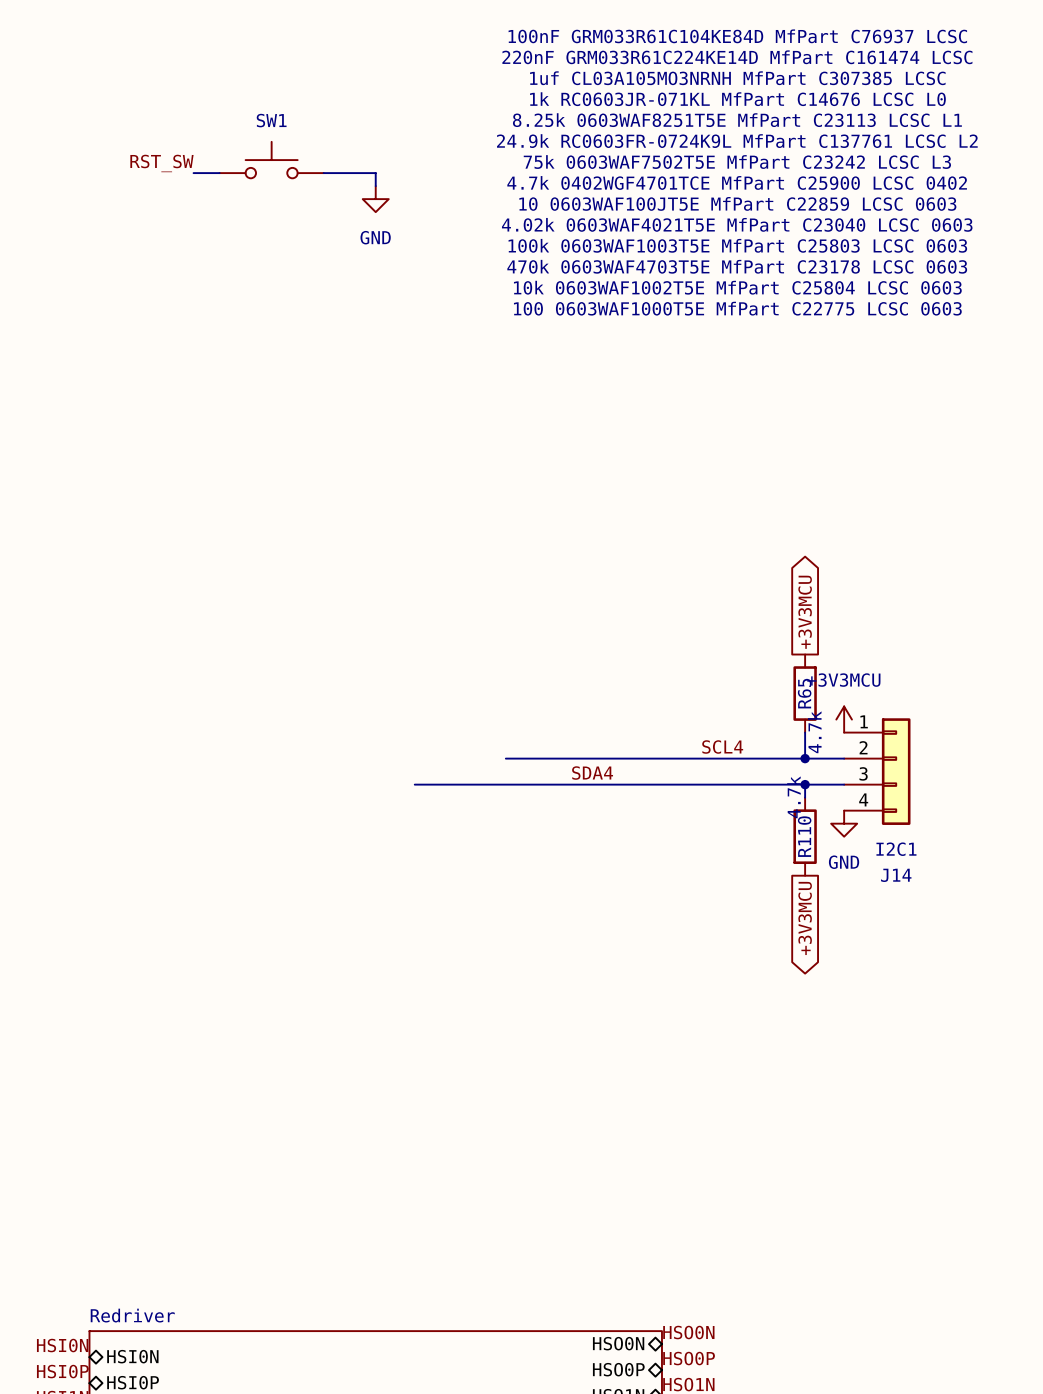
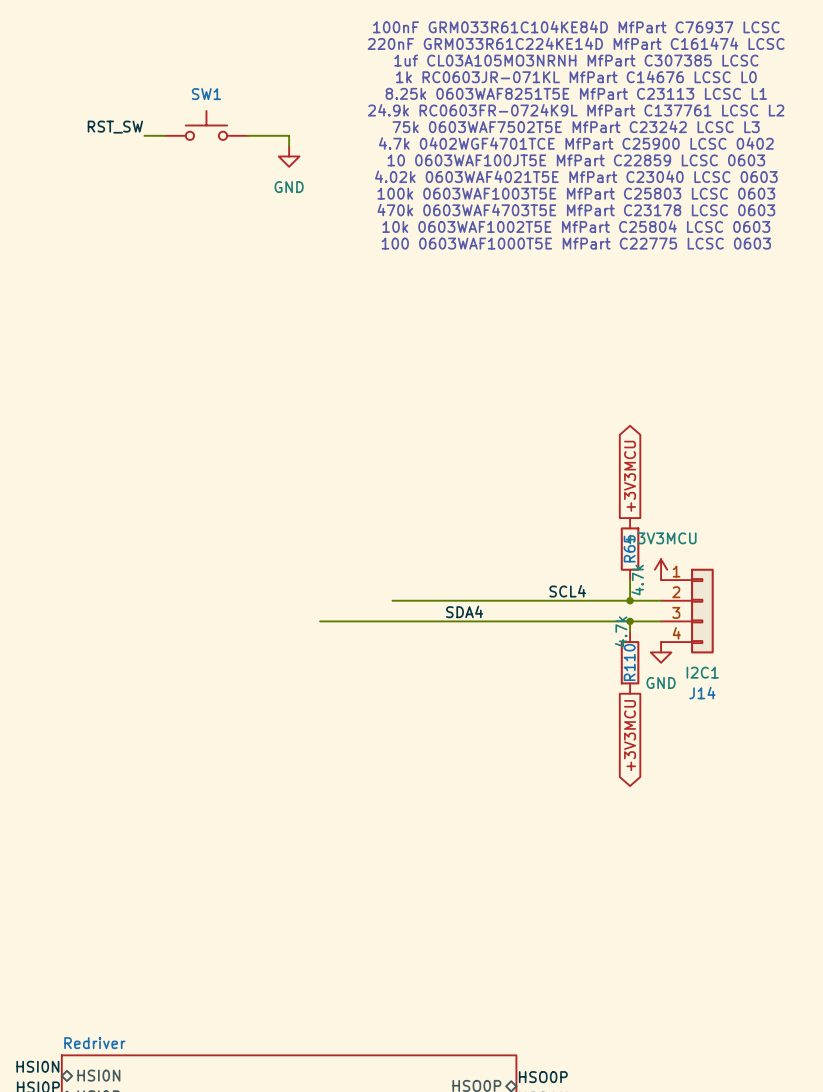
label: HSO0N (688, 1332) -> none
sheet pin: HSO0N (618, 1343) -> none

